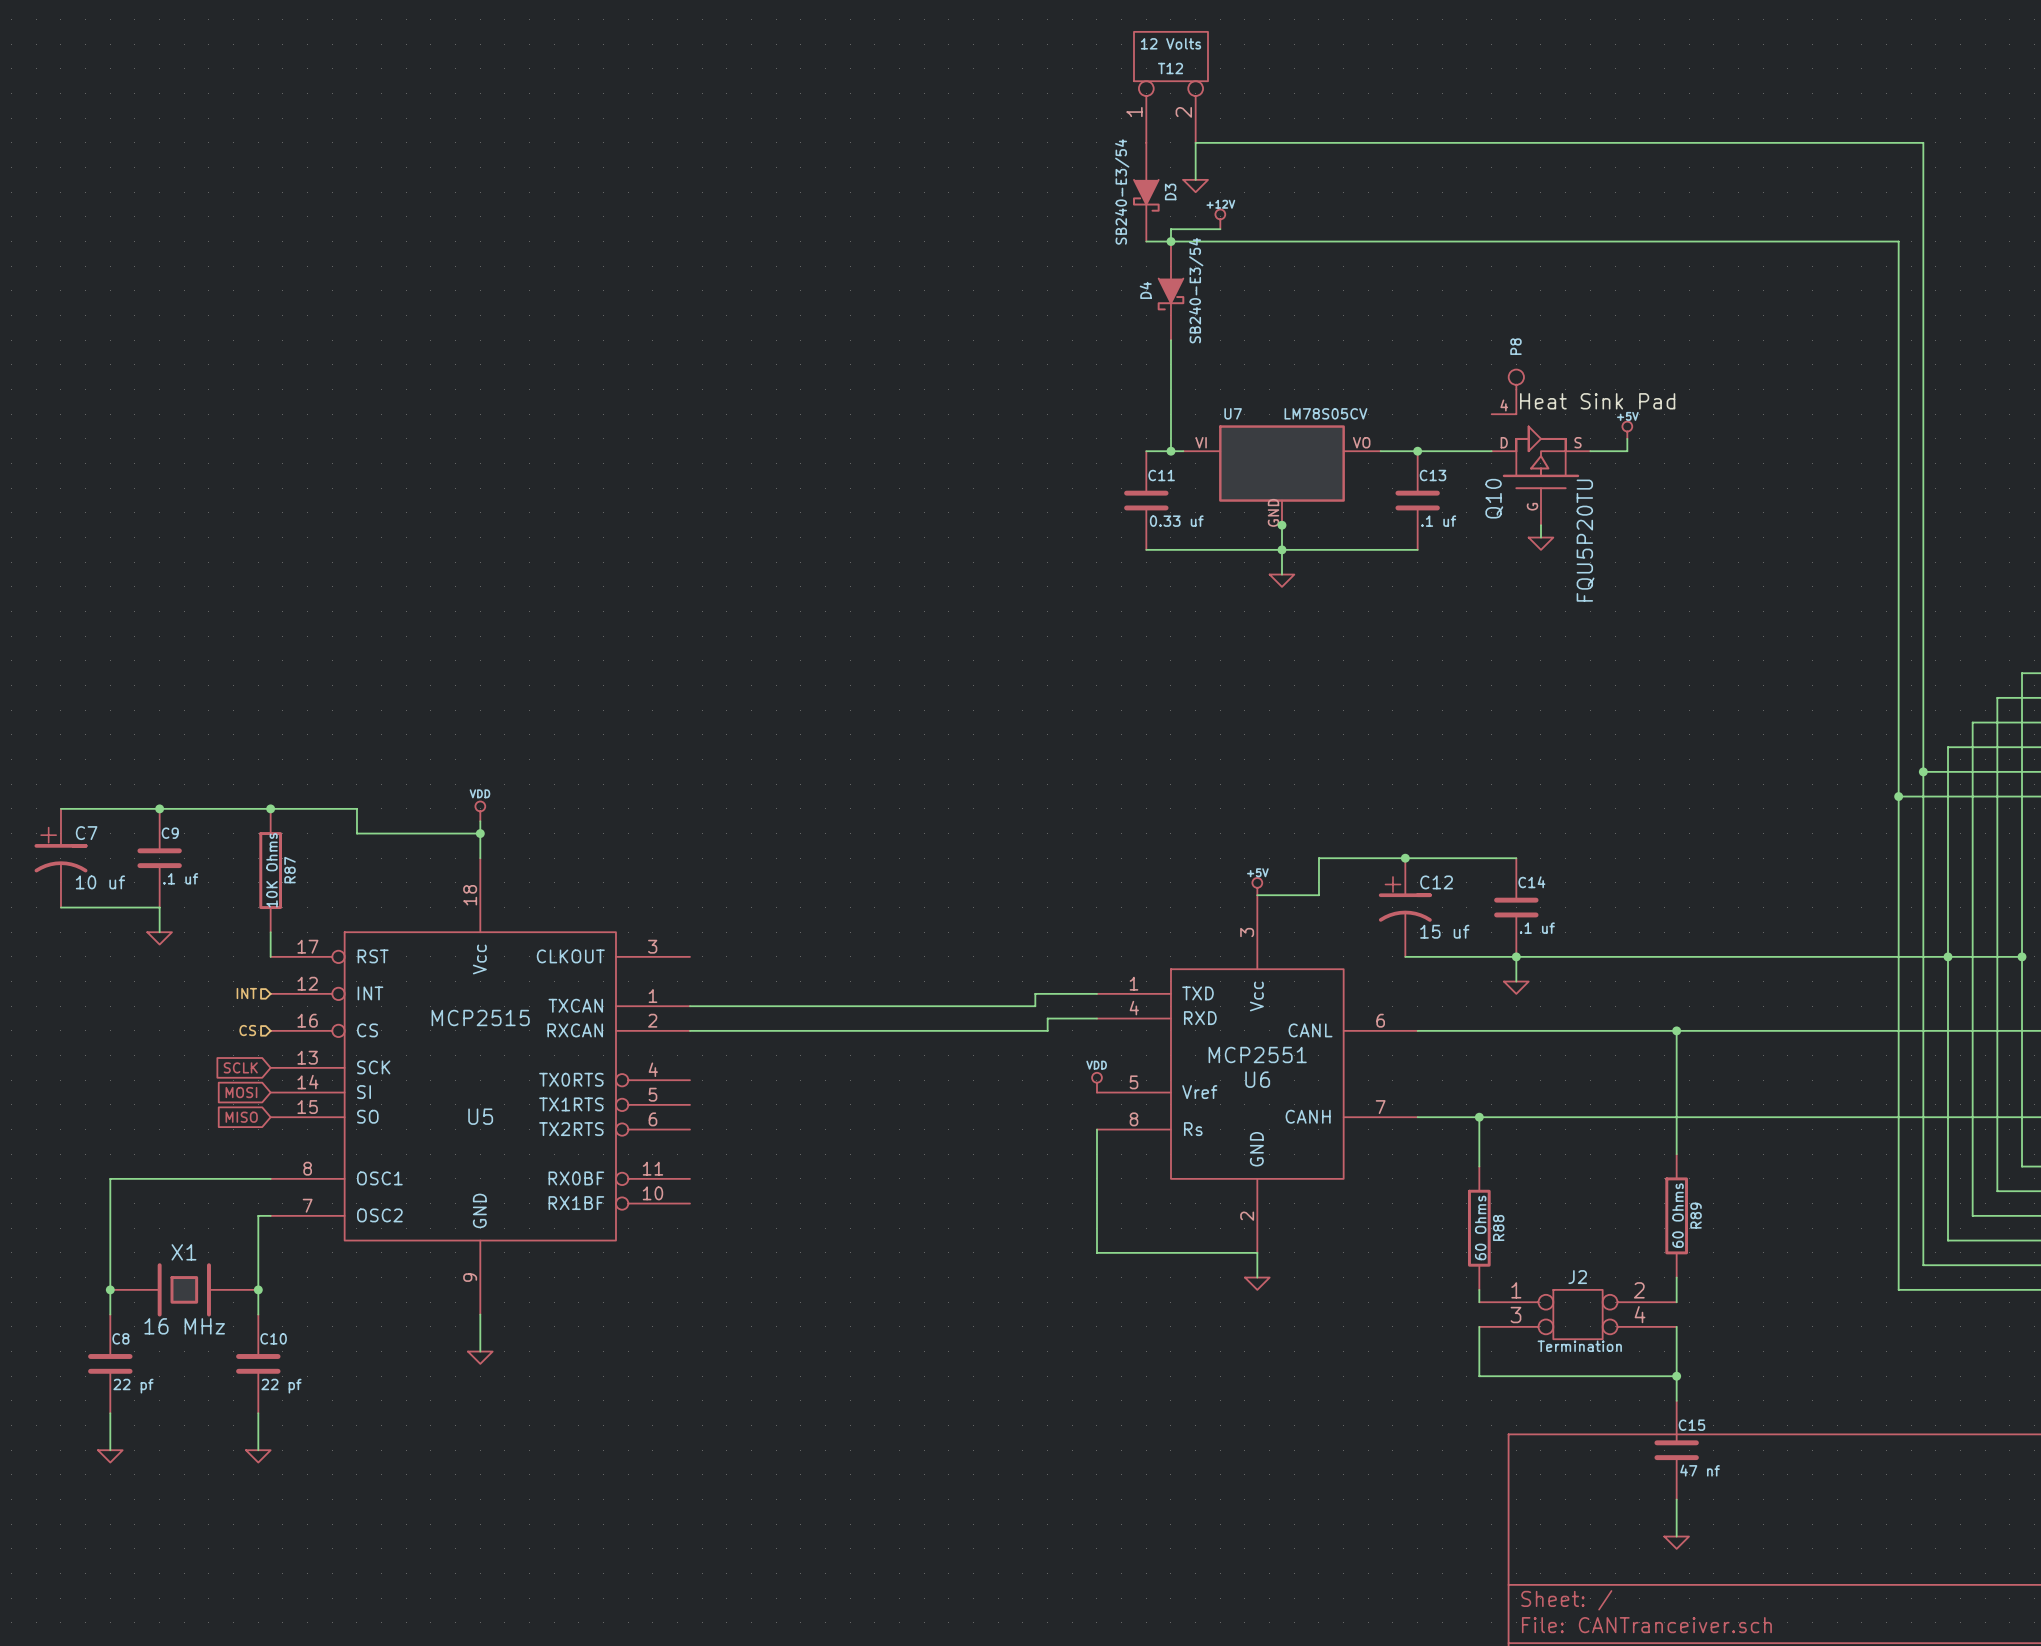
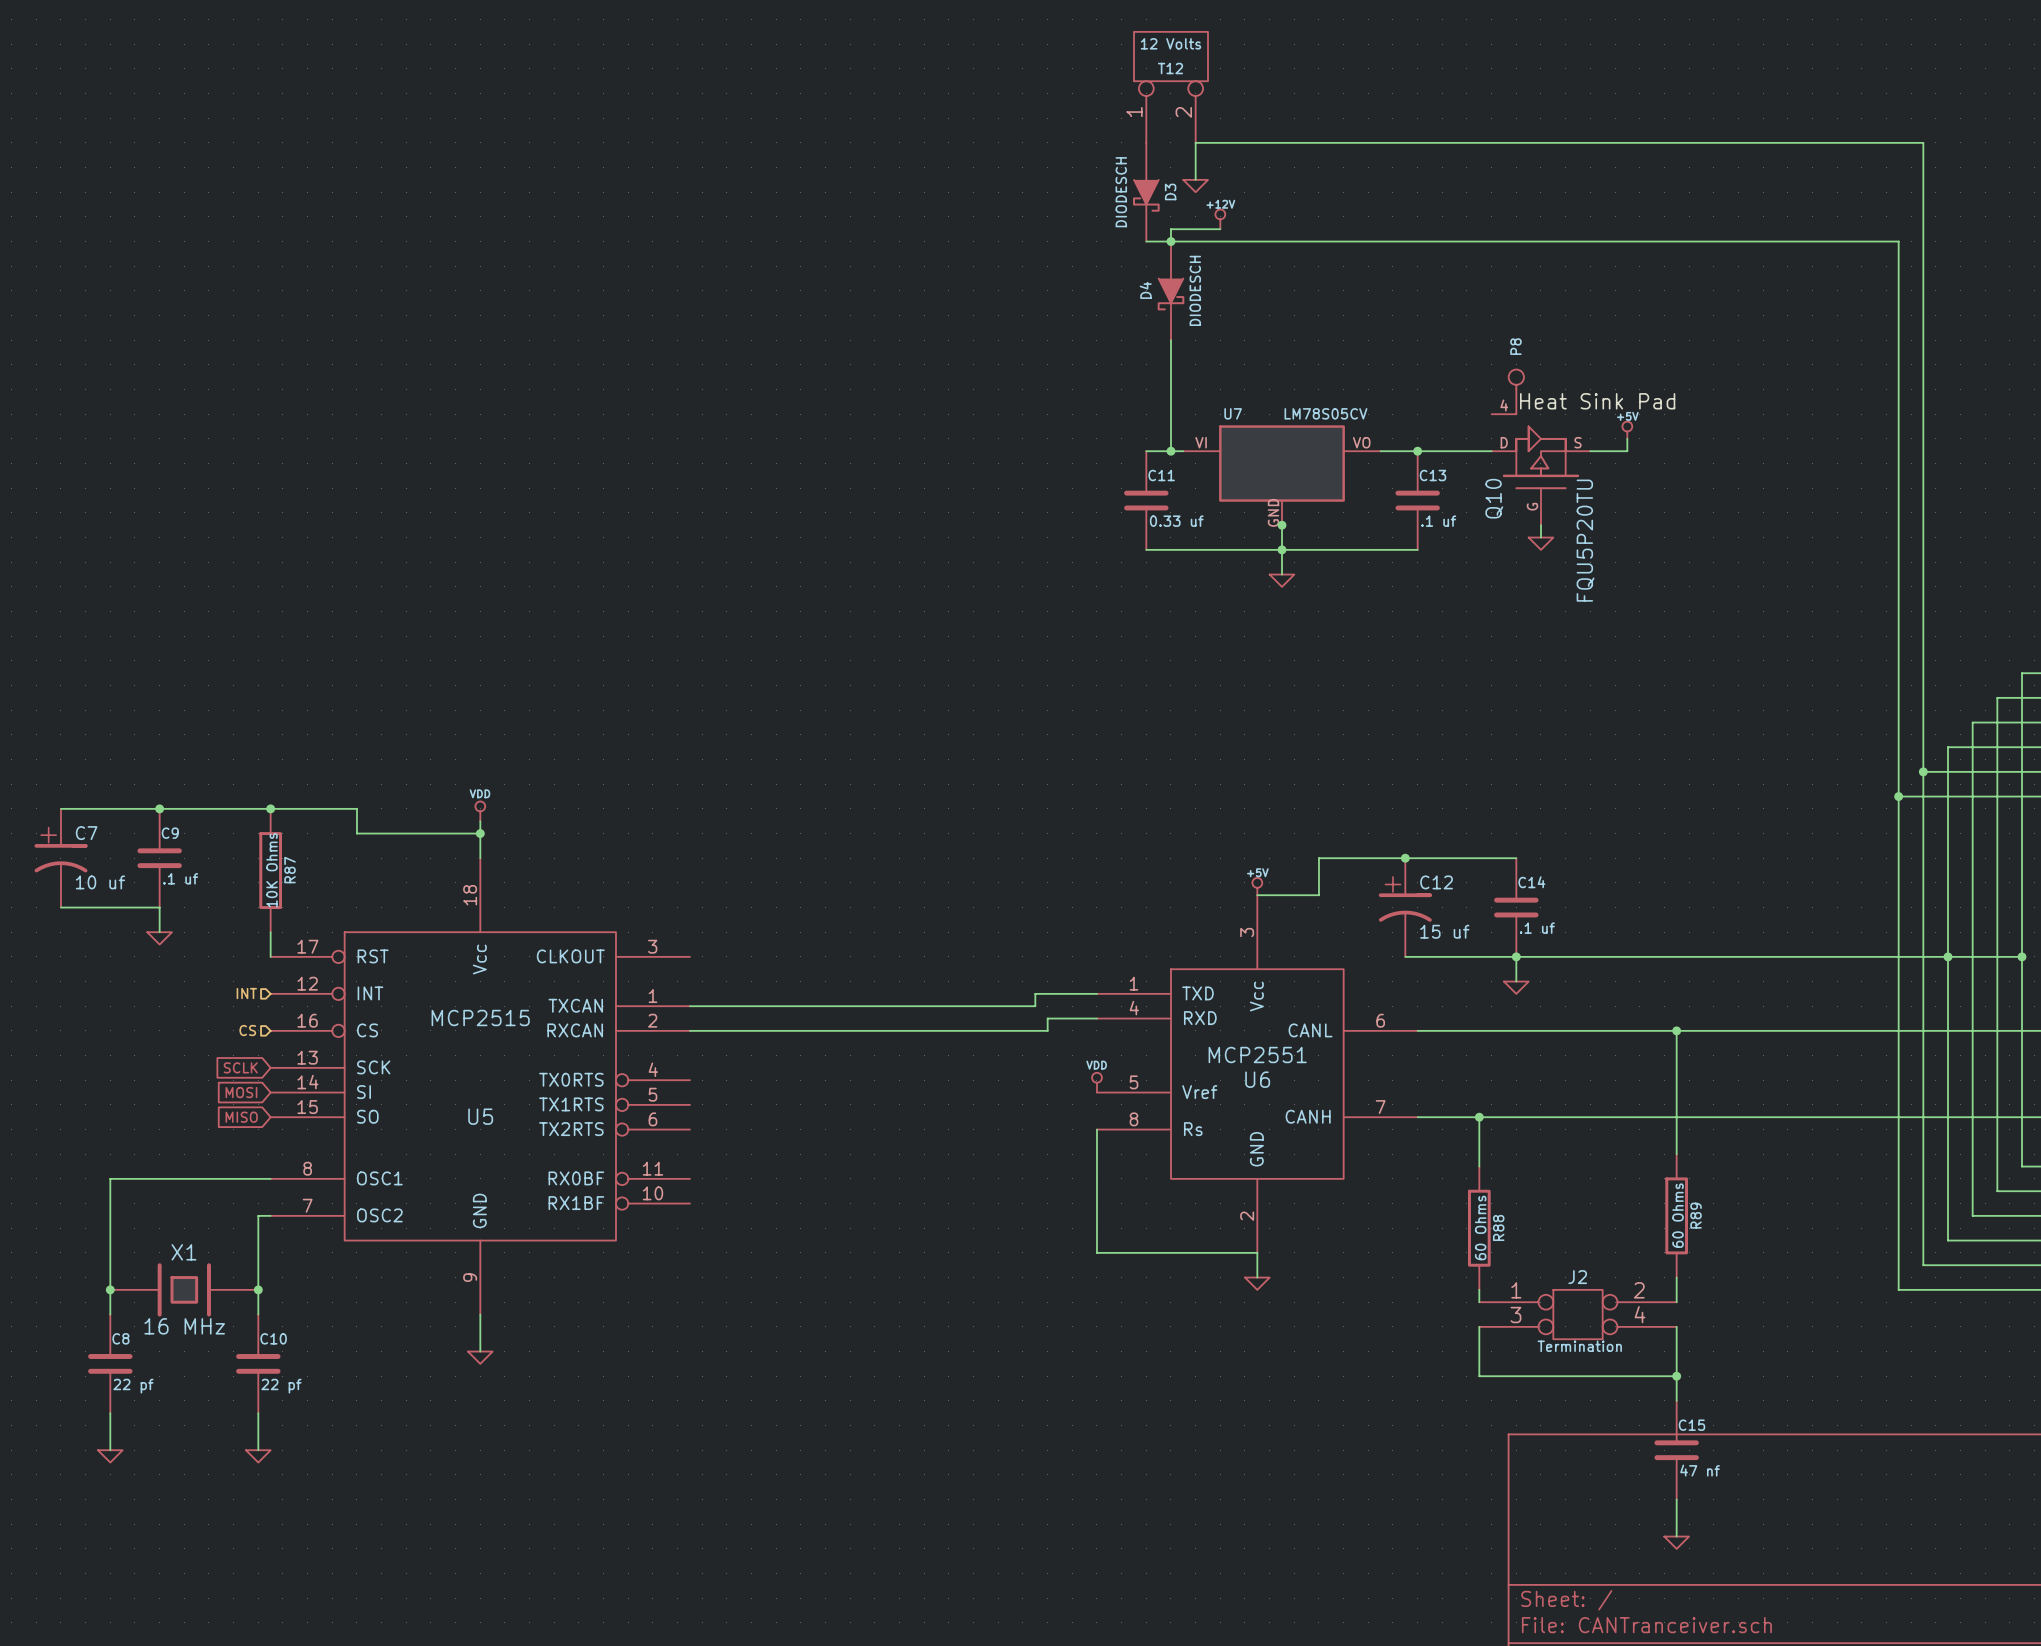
D3 value: SB240-E3/54 (1122, 191) -> DIODESCH (1121, 192)
D4 value: SB240-E3/54 (1196, 290) -> DIODESCH (1195, 290)

